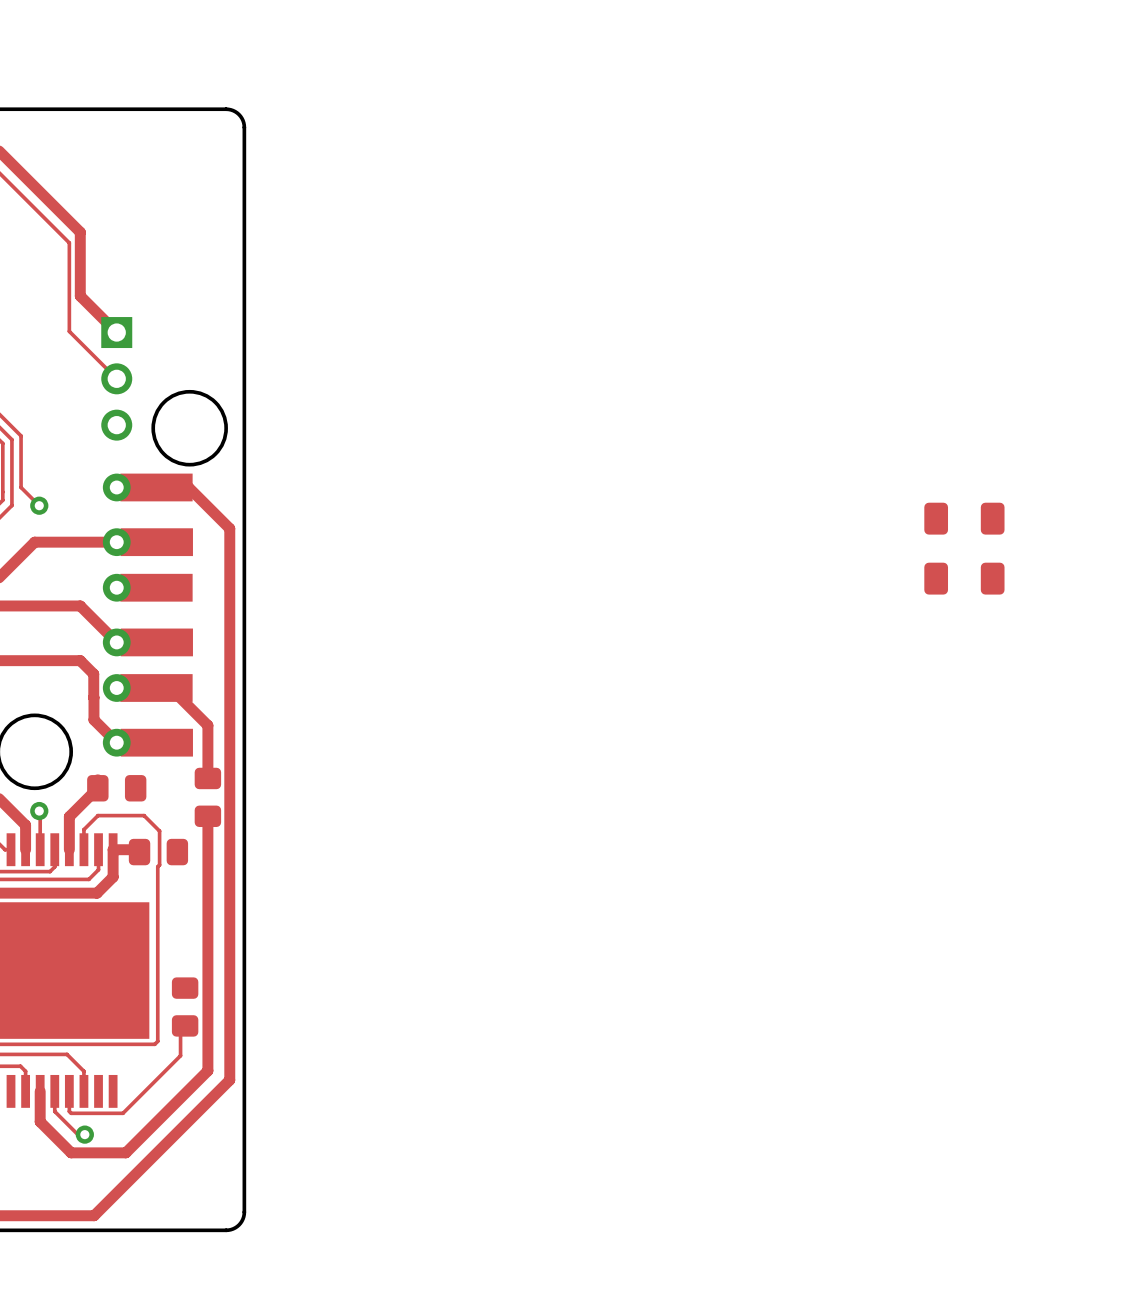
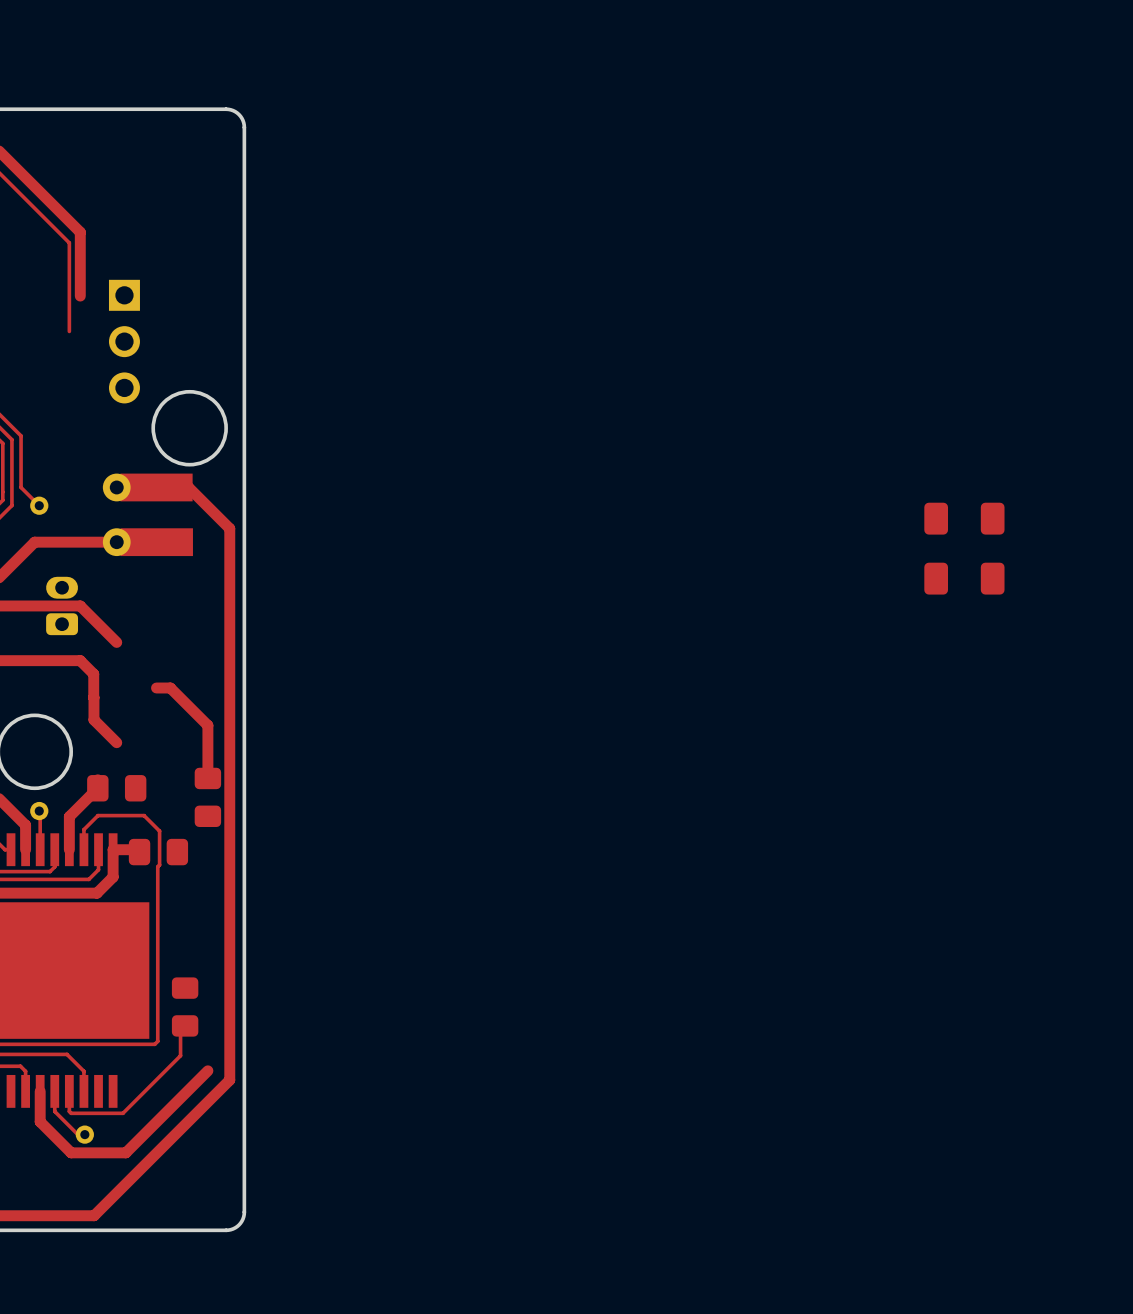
top track: (80, 296) (116, 332) -> none
top track: (69, 331) (116, 378) -> none
part position: (116, 378) -> (124, 341)
part: none -> (62, 605)
part: (147, 615) -> none
part: (147, 715) -> none
top track: (207, 816) (207, 1070) -> none

